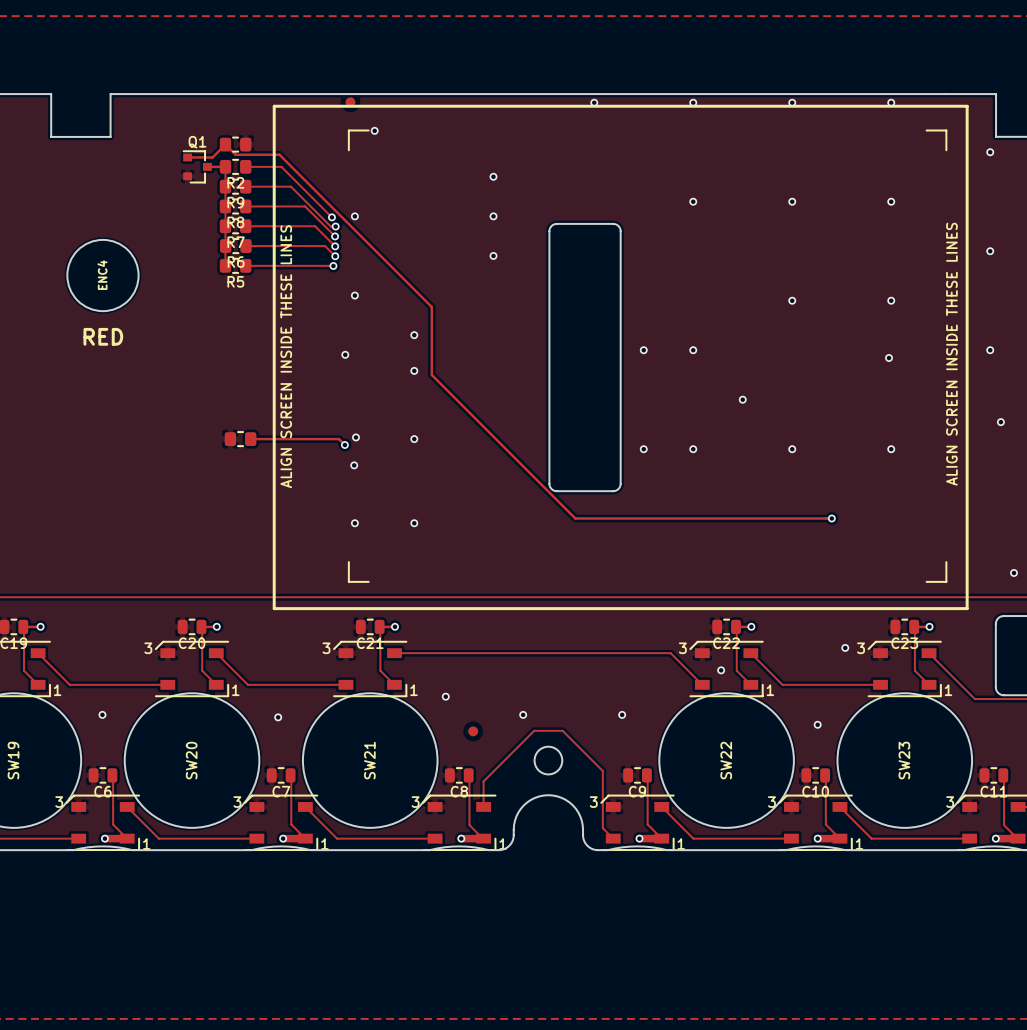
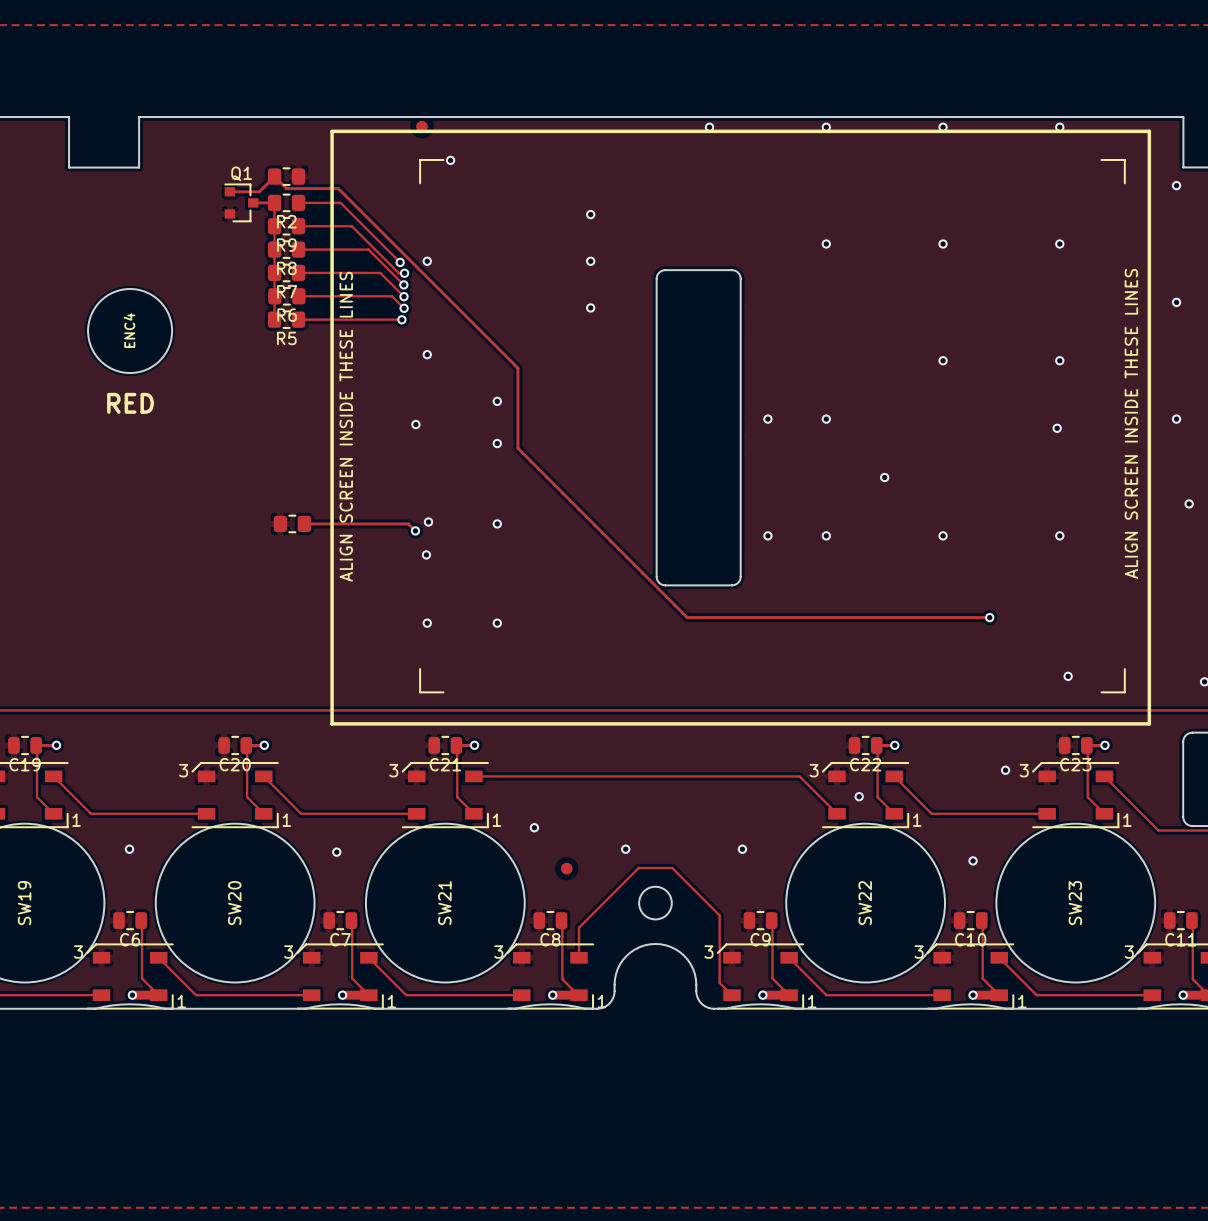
via: none -> (1068, 676)

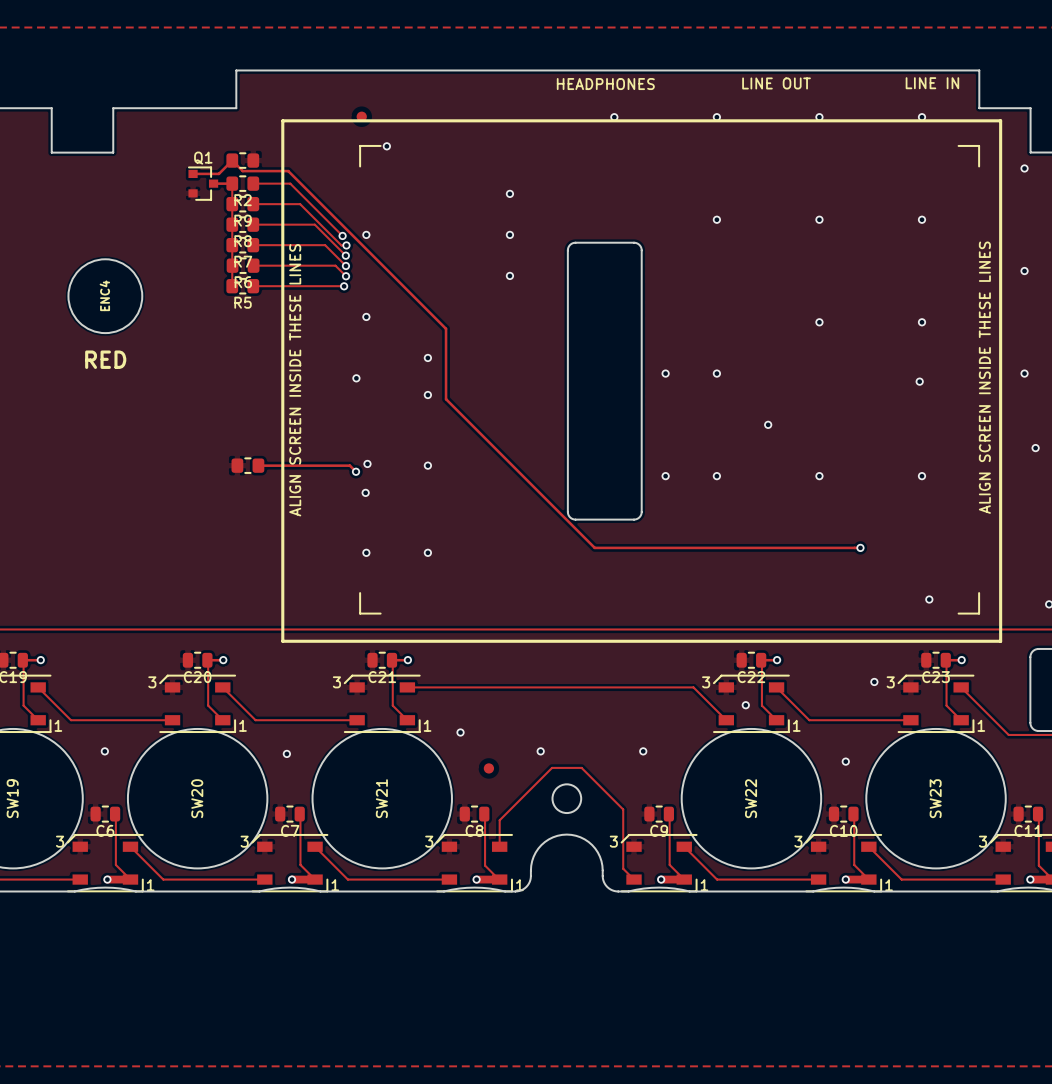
text: none -> LINE OUT (776, 83)
text: none -> LINE IN (932, 83)
text: none -> HEADPHONES (605, 84)
board edge: (279, 117) (1125, 117) -> (236, 108) (236, 70) (979, 70) (979, 108)

